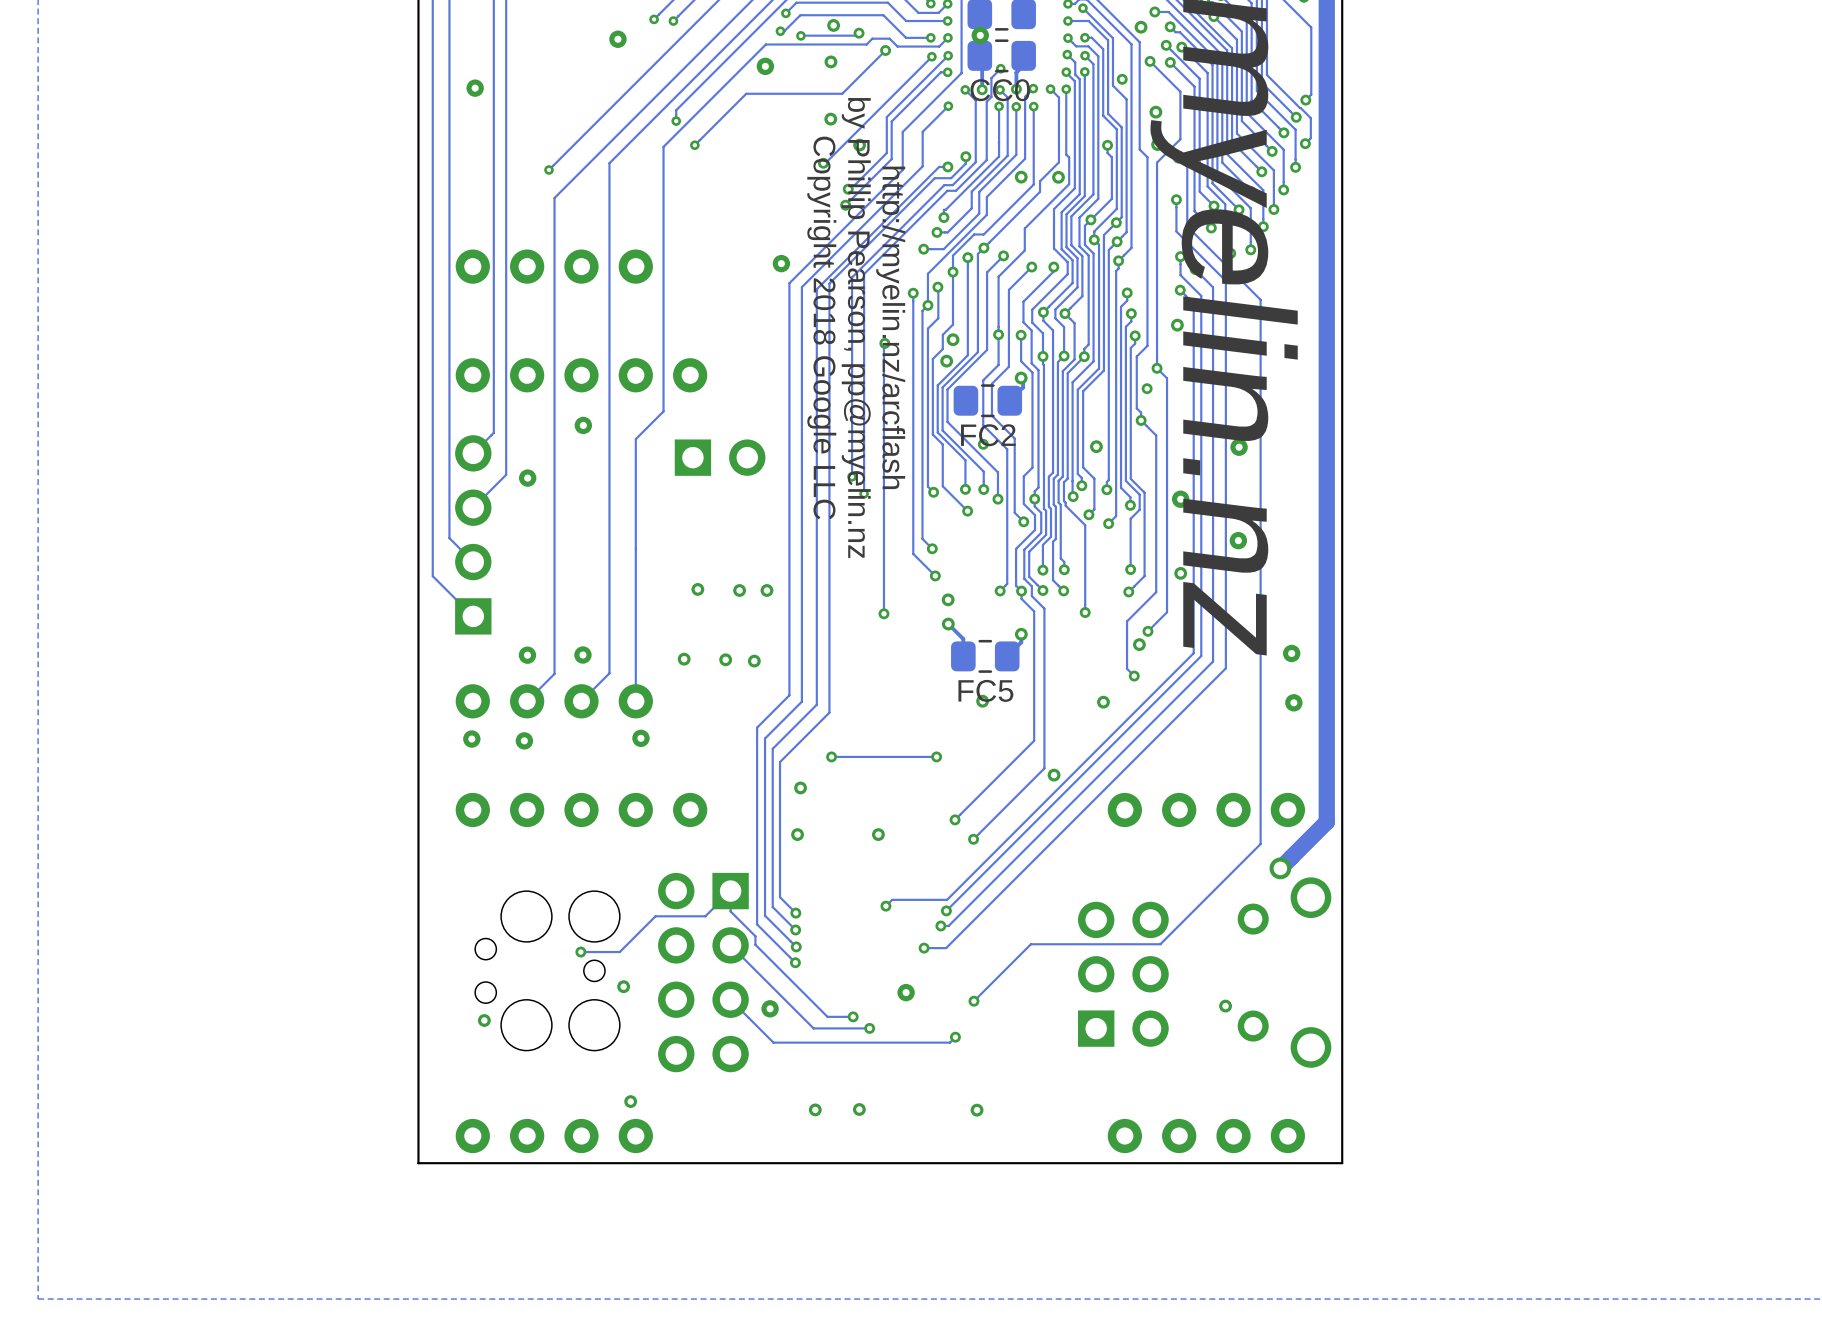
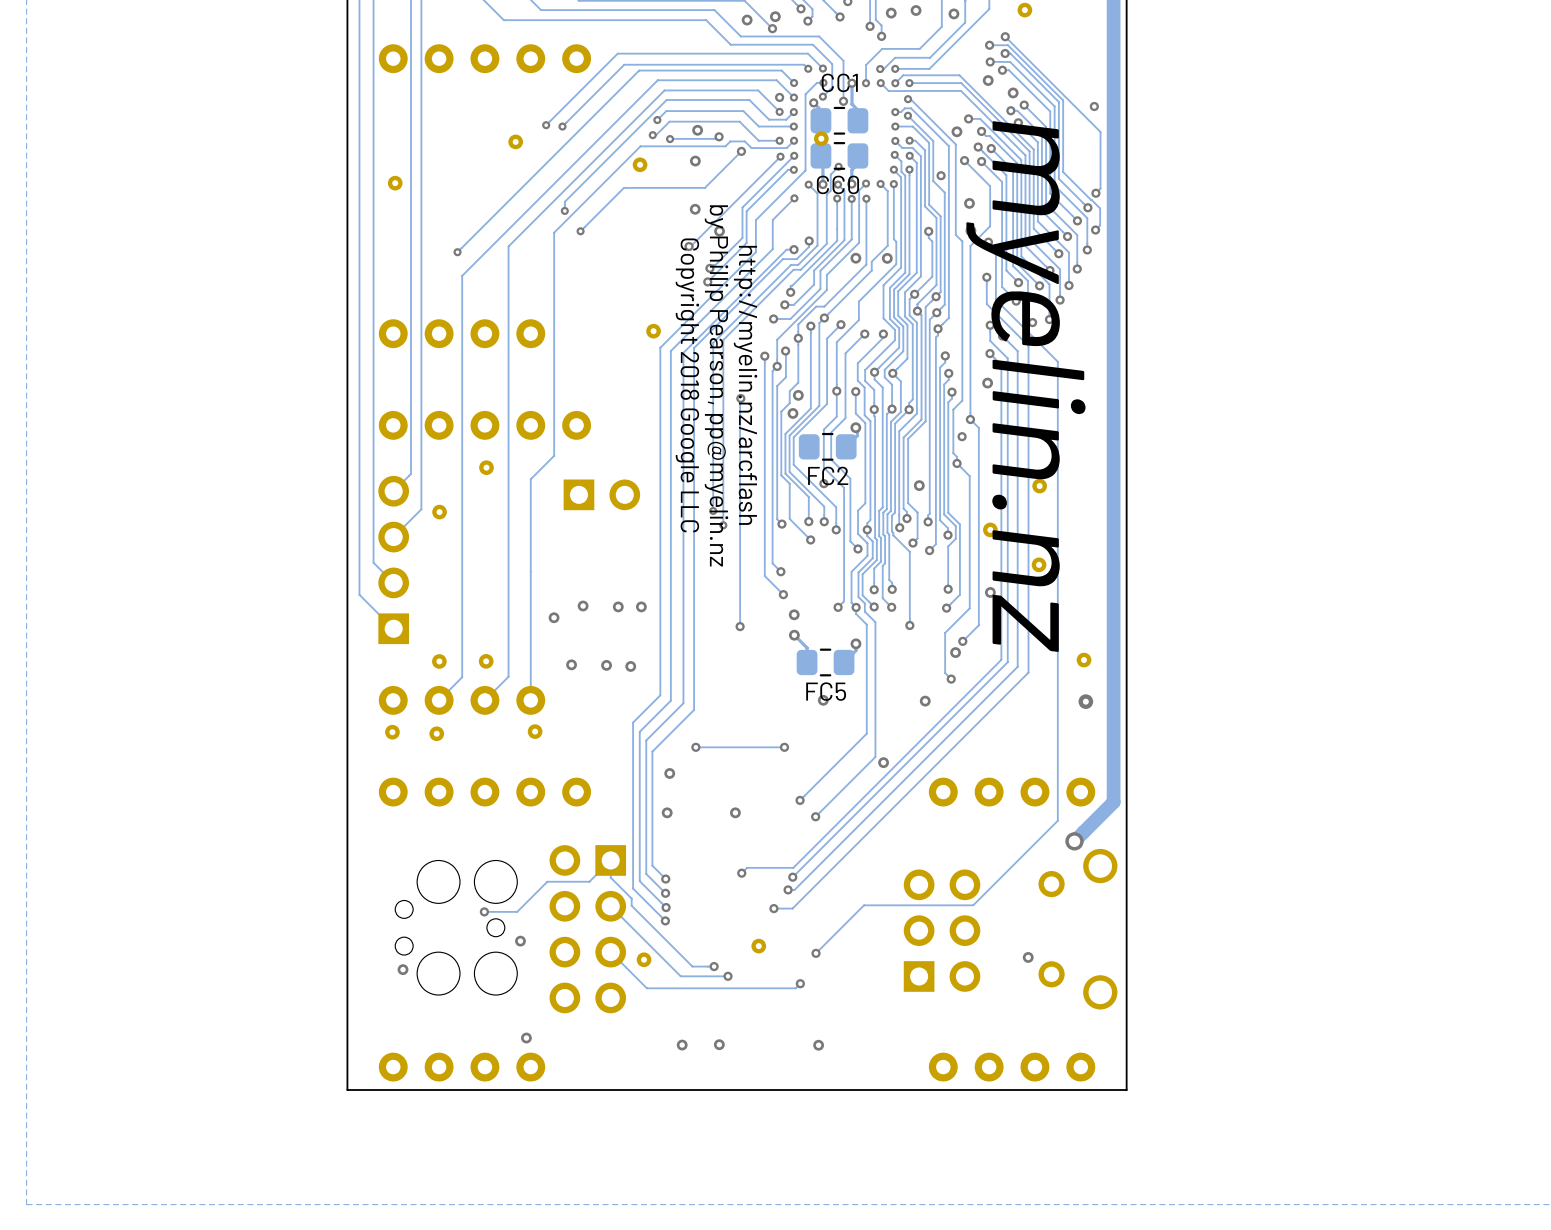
via: none -> (554, 617)

